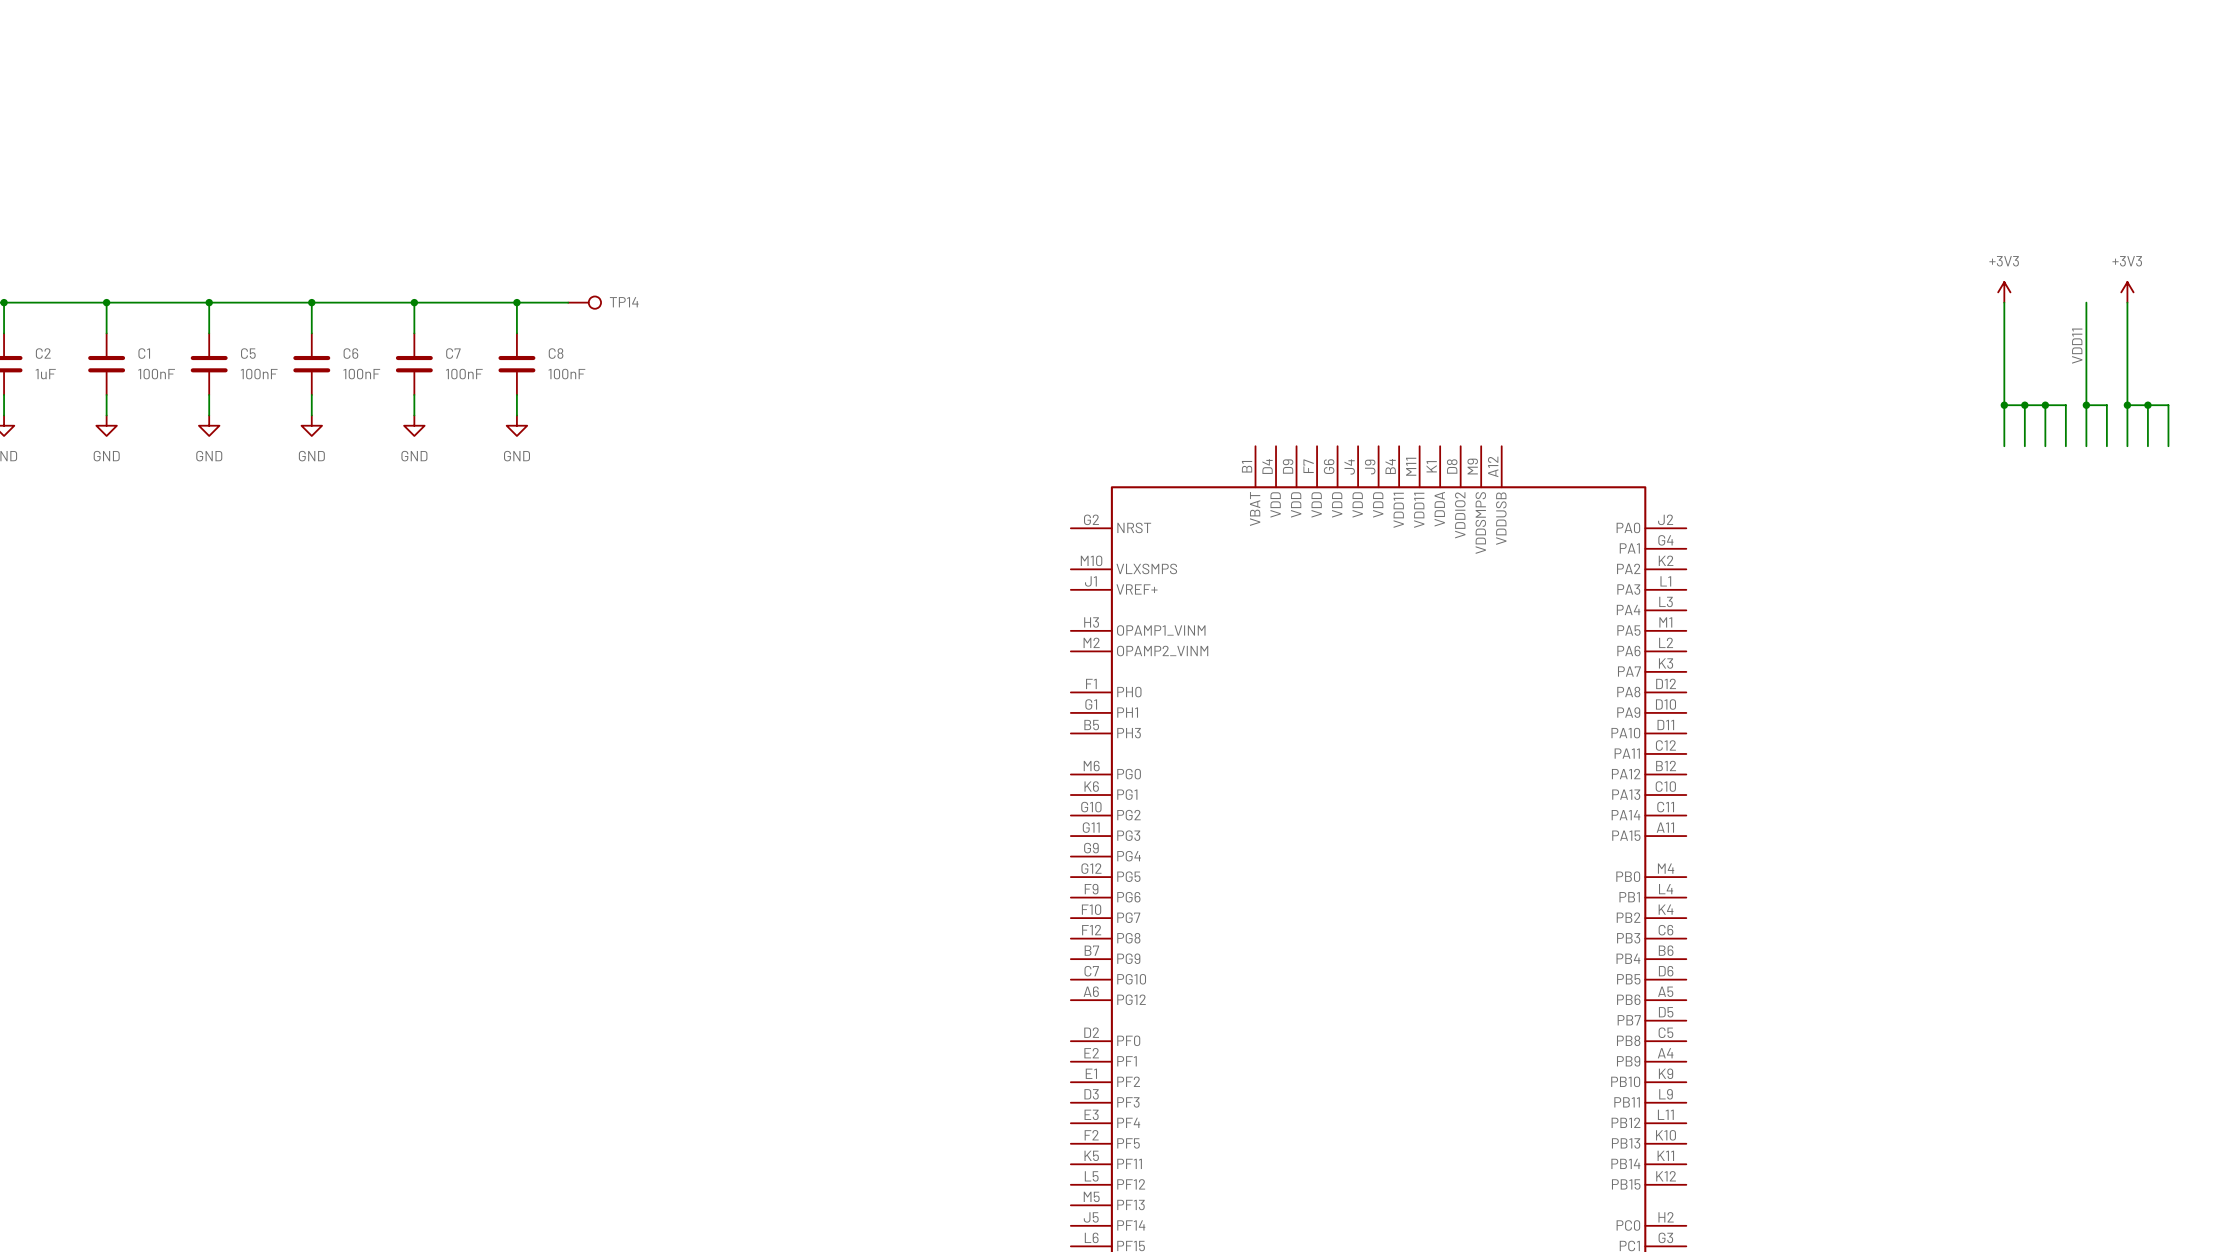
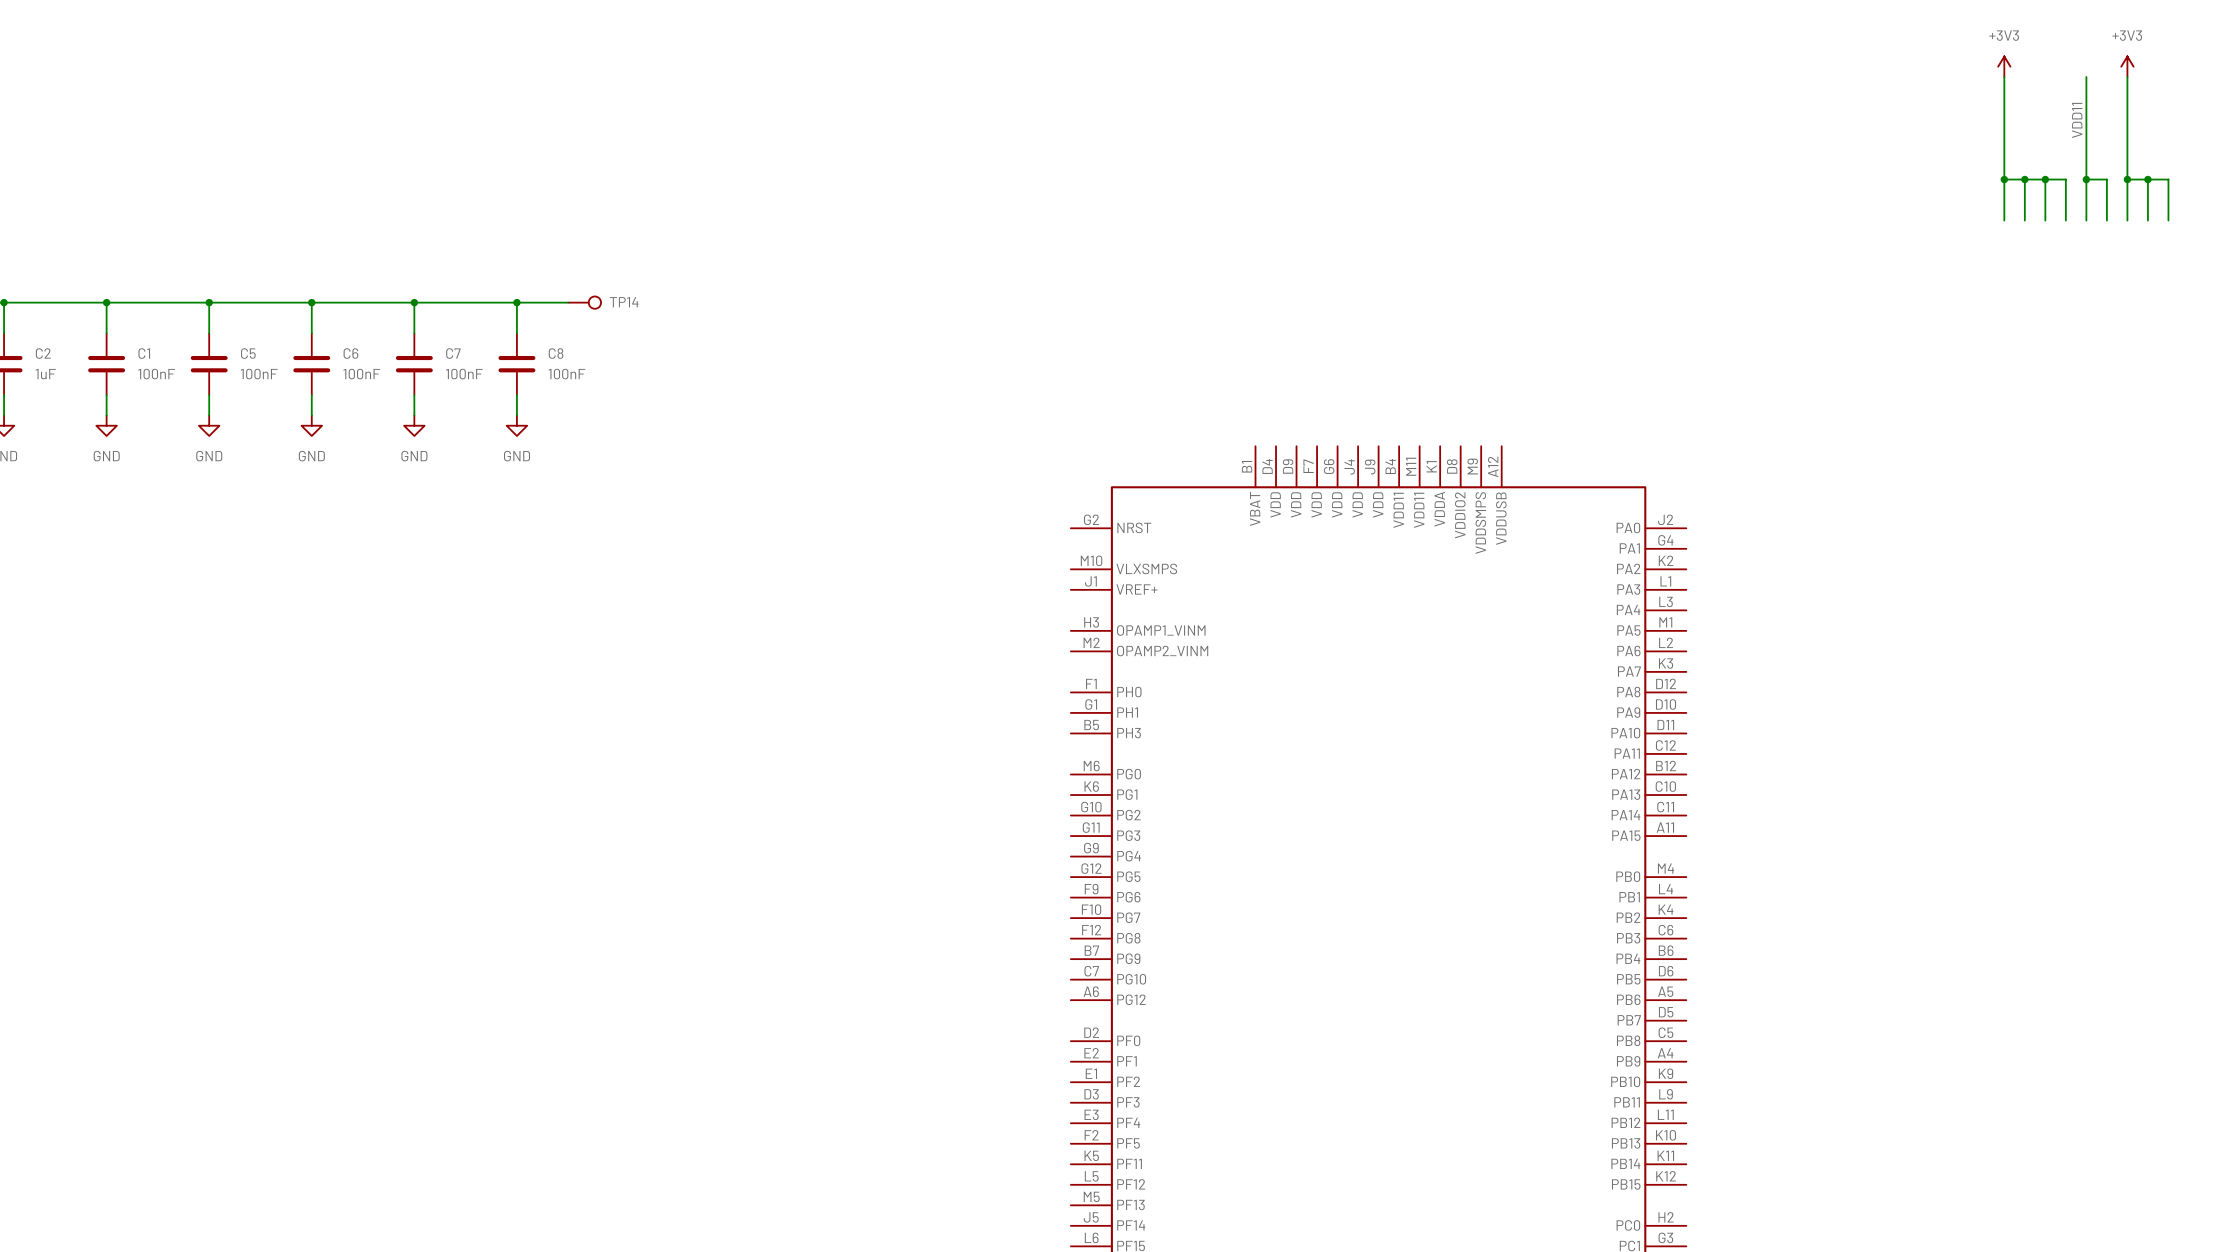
power symbol: none -> +3V3 (2004, 66)
power symbol: none -> +3V3 (2127, 66)
wire: none -> (2004, 76) (2004, 220)
wire: none -> (2086, 76) (2086, 220)
wire: none -> (2127, 76) (2127, 220)
label: none -> VDD11 (2077, 120)
wire: none -> (2004, 179) (2065, 179) (2065, 220)
junction: none -> (2004, 179)
wire: none -> (2024, 179) (2024, 220)
junction: none -> (2024, 179)
wire: none -> (2045, 179) (2045, 220)
junction: none -> (2045, 179)
wire: none -> (2086, 179) (2106, 179) (2106, 220)
junction: none -> (2086, 179)
wire: none -> (2127, 179) (2168, 179) (2168, 220)
junction: none -> (2127, 179)
wire: none -> (2147, 179) (2147, 220)
junction: none -> (2147, 179)
power symbol: +3V3 (2004, 292) -> none
power symbol: +3V3 (2127, 292) -> none
wire: (2004, 302) (2004, 446) -> none
wire: (2086, 302) (2086, 446) -> none
wire: (2127, 302) (2127, 446) -> none
label: VDD11 (2077, 346) -> none
wire: (2004, 405) (2065, 405) (2065, 446) -> none
junction: (2004, 405) -> none
wire: (2024, 405) (2024, 446) -> none
junction: (2024, 405) -> none
wire: (2045, 405) (2045, 446) -> none
junction: (2045, 405) -> none
wire: (2086, 405) (2106, 405) (2106, 446) -> none
junction: (2086, 405) -> none
wire: (2127, 405) (2168, 405) (2168, 446) -> none
junction: (2127, 405) -> none
wire: (2147, 405) (2147, 446) -> none
junction: (2147, 405) -> none

